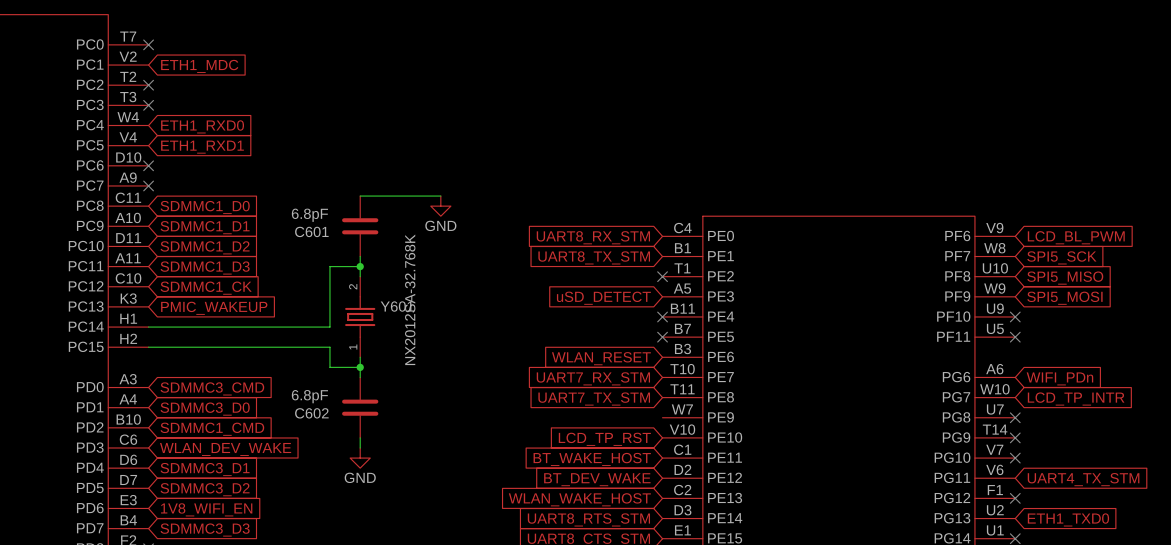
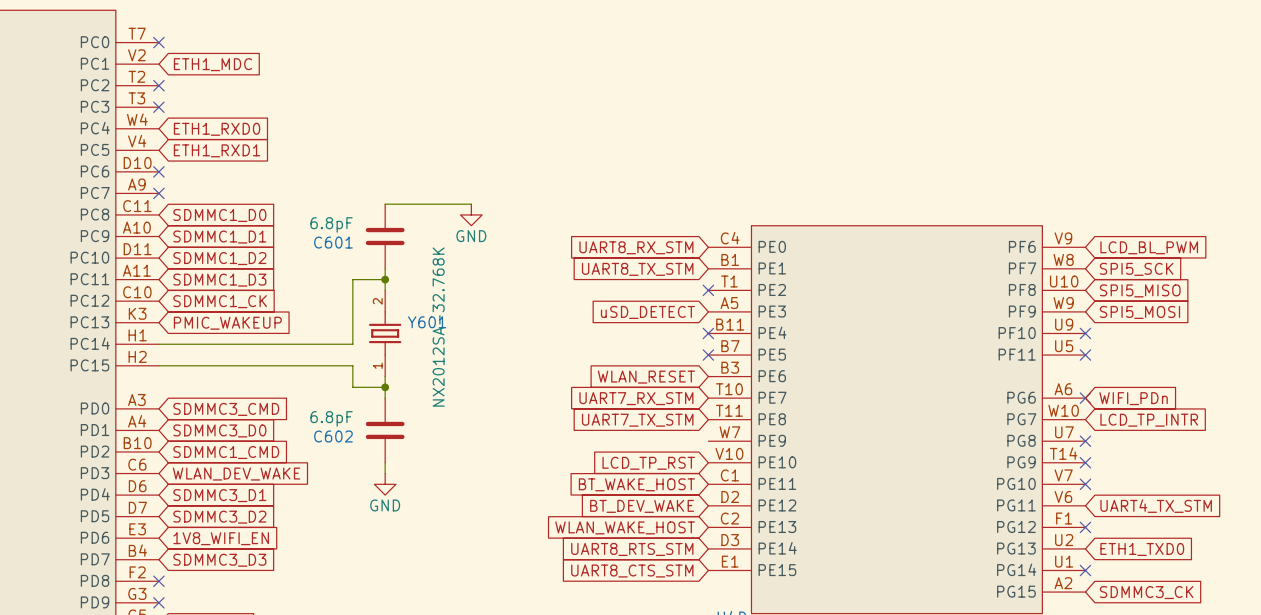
no-connect mark: none -> (1085, 398)

